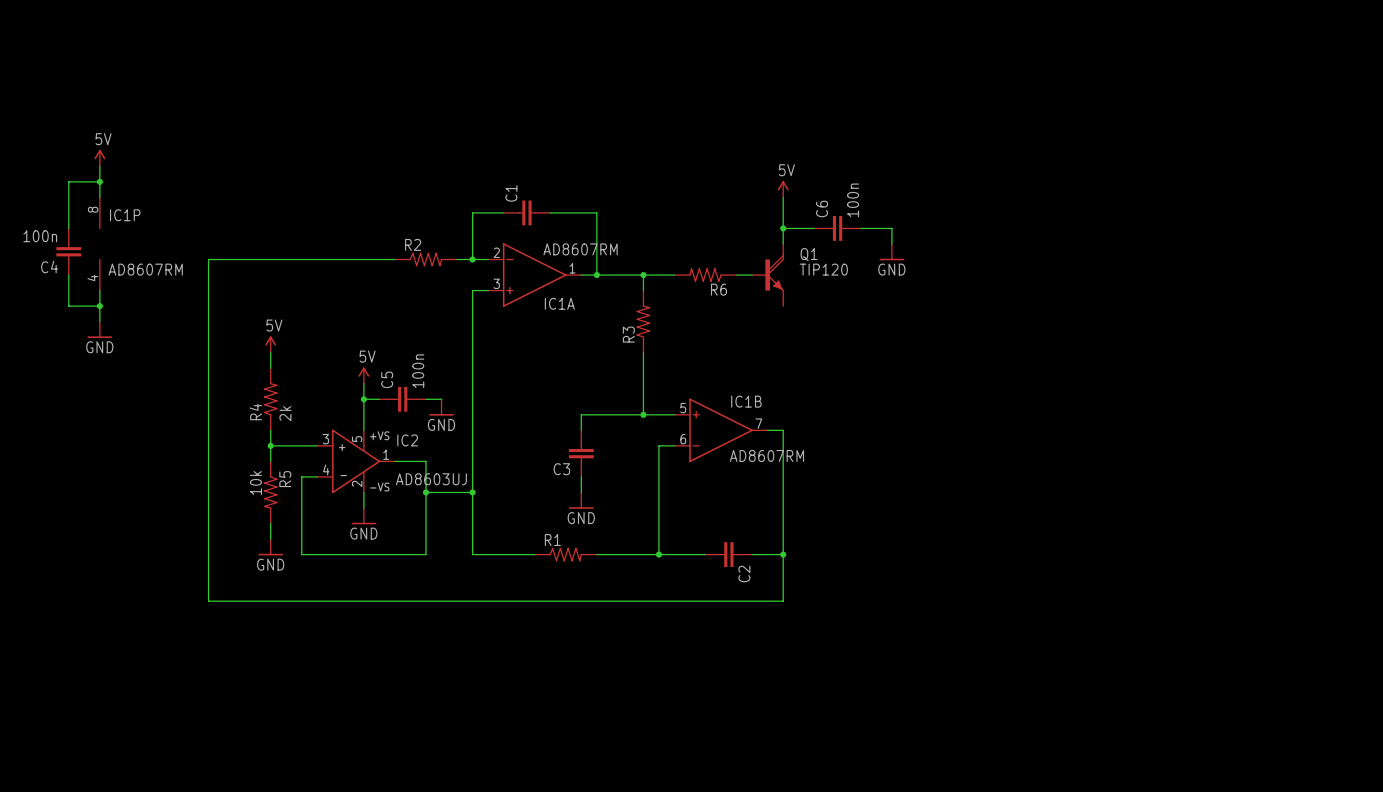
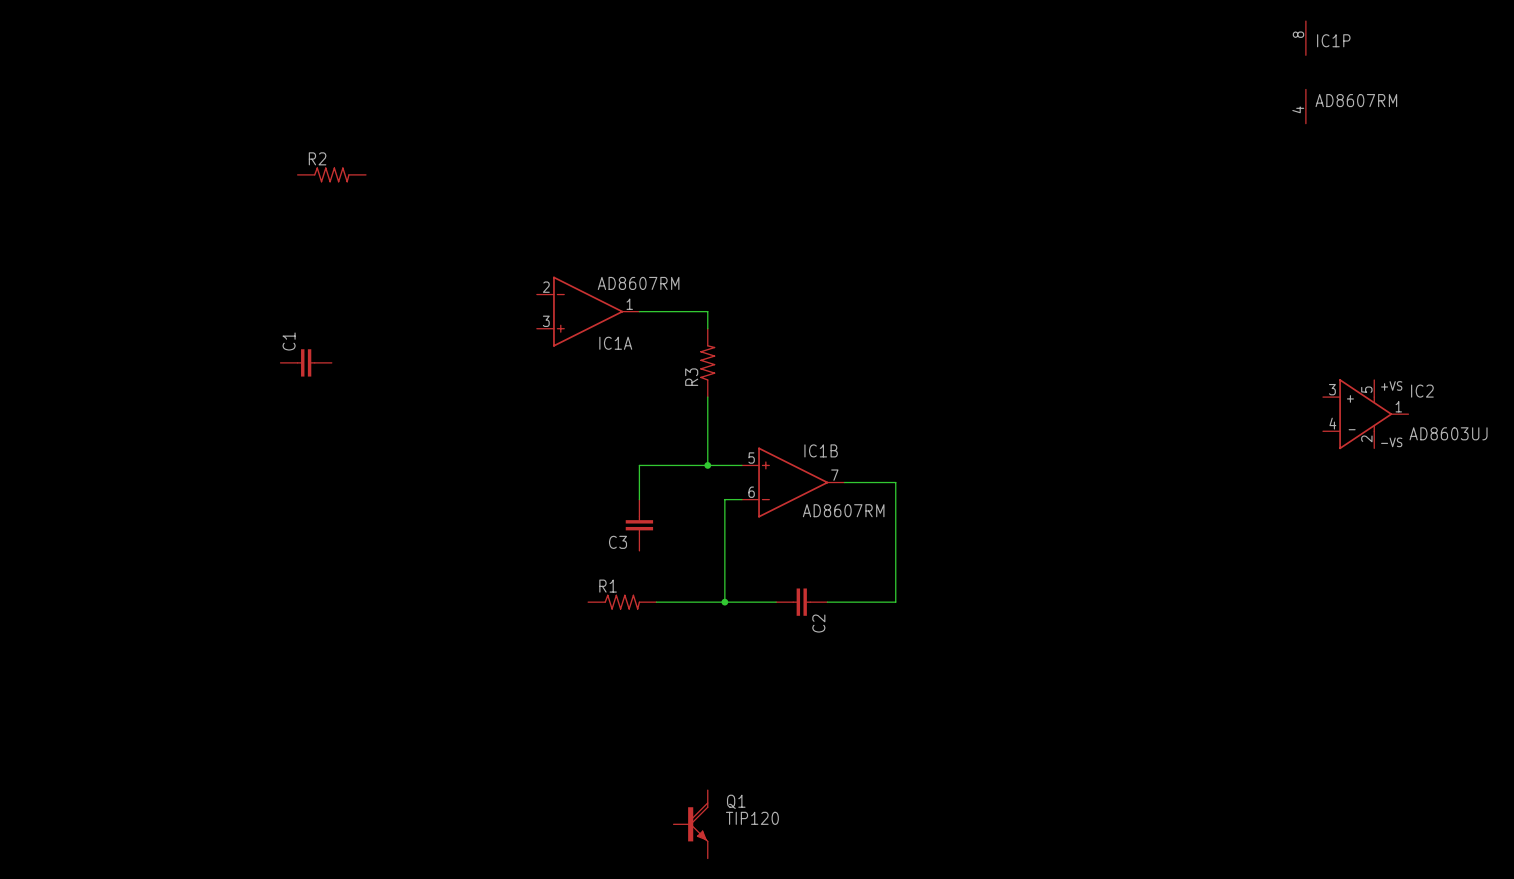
power symbol: 5V (99, 158) -> none
wire: (99, 166) (99, 197) -> none
wire: (99, 181) (68, 181) (68, 228) -> none
junction: (99, 181) -> none
power symbol: 5V (783, 189) -> none
wire: (783, 197) (783, 243) -> none
wire: (503, 212) (472, 212) (472, 259) -> none
C1 position: (526, 212) -> (306, 362)
wire: (550, 212) (596, 212) (596, 275) -> none
wire: (783, 228) (814, 228) -> none
junction: (783, 228) -> none
C6: 100n (837, 228) -> none
wire: (860, 228) (891, 228) (891, 243) -> none
IC1P position: (99, 243) -> (1305, 72)
C4: 100n (68, 251) -> none
power symbol: GND (891, 252) -> none
wire: (394, 259) (208, 259) (208, 601) (783, 601) (783, 430) -> (827, 602) (895, 602) (895, 482) (861, 482)
R2 position: (426, 259) -> (331, 174)
wire: (457, 259) (488, 259) -> none
junction: (472, 259) -> none
wire: (68, 275) (68, 306) (99, 306) -> none
junction: (596, 275) -> none
wire: (643, 275) (674, 275) -> none
junction: (643, 275) -> none
R6: (705, 275) -> none
wire: (736, 275) (752, 275) -> none
Q1 position: (767, 275) -> (690, 824)
wire: (99, 290) (99, 321) -> none
wire: (488, 290) (472, 290) (472, 554) (534, 554) -> none
junction: (99, 306) -> none
power symbol: GND (99, 329) -> none
power symbol: 5V (270, 344) -> none
wire: (270, 352) (270, 368) -> none
power symbol: 5V (363, 375) -> none
wire: (363, 383) (363, 430) -> none
R4: 2k (270, 399) -> none
wire: (363, 399) (379, 399) -> none
junction: (363, 399) -> none
C5: 100n (402, 399) -> none
wire: (426, 399) (441, 399) -> none
power symbol: GND (441, 407) -> none
wire: (270, 430) (270, 461) -> none
wire: (270, 445) (317, 445) -> none
junction: (270, 445) -> none
C3 position: (581, 453) -> (639, 525)
IC2 position: (356, 461) -> (1365, 414)
wire: (394, 461) (426, 461) (426, 554) (301, 554) (301, 476) (317, 476) -> none
R5: 10k (270, 492) -> none
wire: (363, 492) (363, 508) -> none
wire: (426, 492) (472, 492) -> none
junction: (426, 492) -> none
junction: (472, 492) -> none
power symbol: GND (581, 500) -> none
power symbol: GND (363, 516) -> none
wire: (270, 523) (270, 539) -> none
wire: (658, 539) (658, 554) -> none
power symbol: GND (270, 547) -> none
R1 position: (565, 554) -> (622, 602)
wire: (596, 554) (705, 554) -> (656, 602) (776, 602)
junction position: (658, 554) -> (724, 602)
C2 position: (728, 554) -> (801, 602)
wire: (752, 554) (783, 554) -> none
junction: (783, 554) -> none

